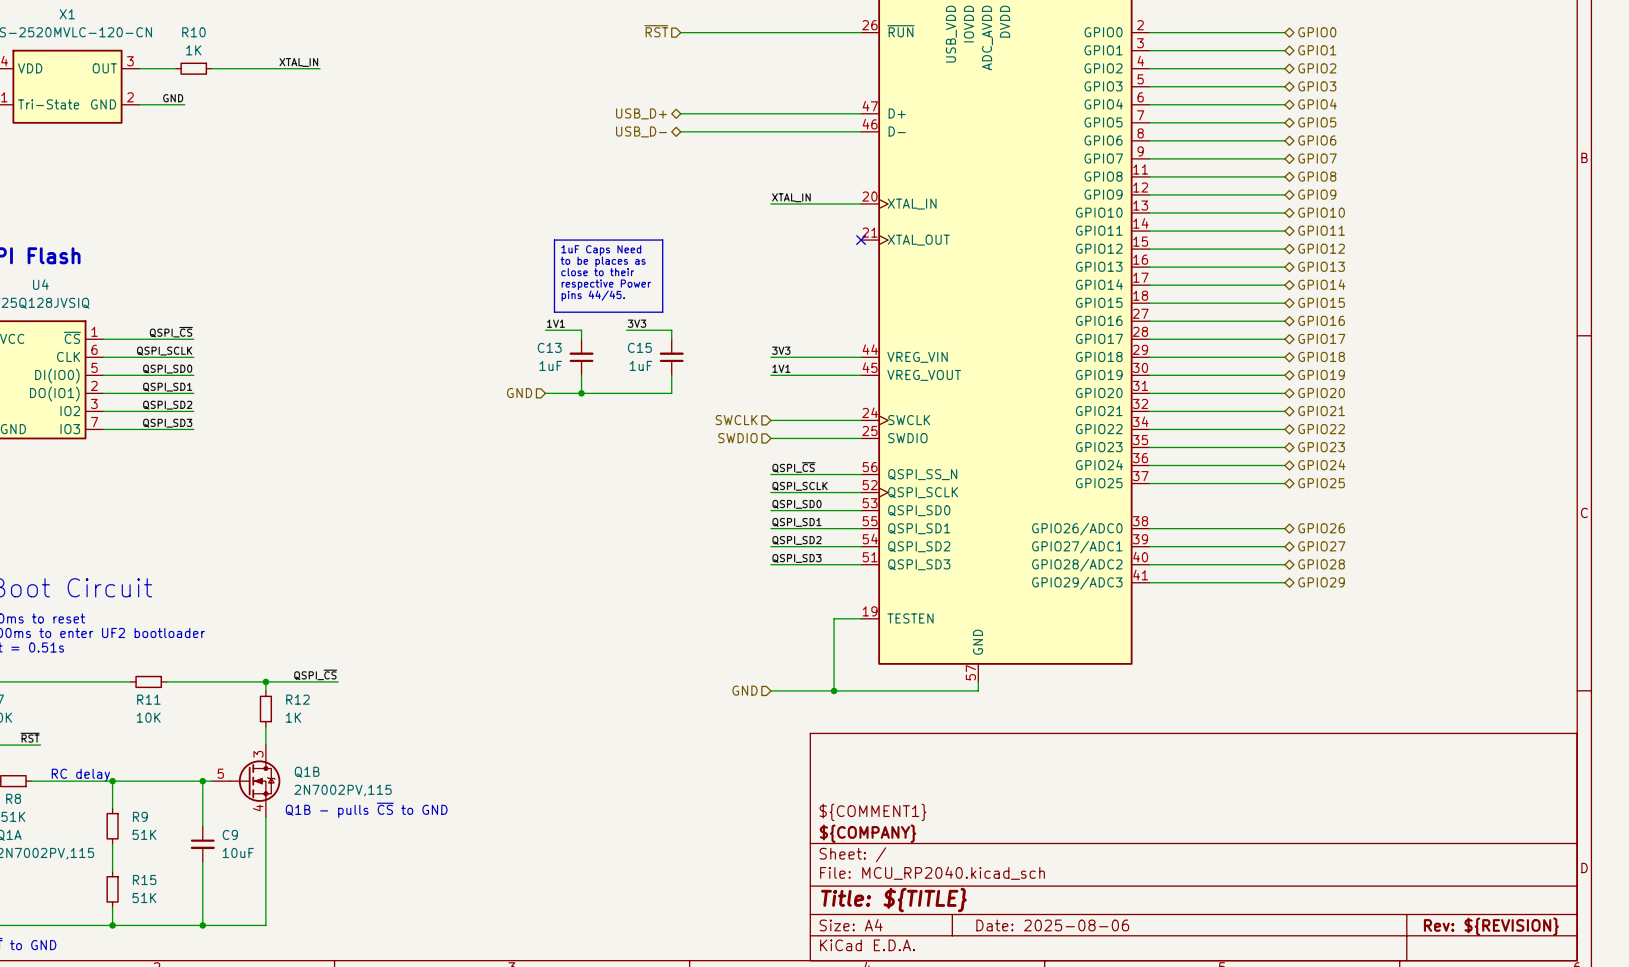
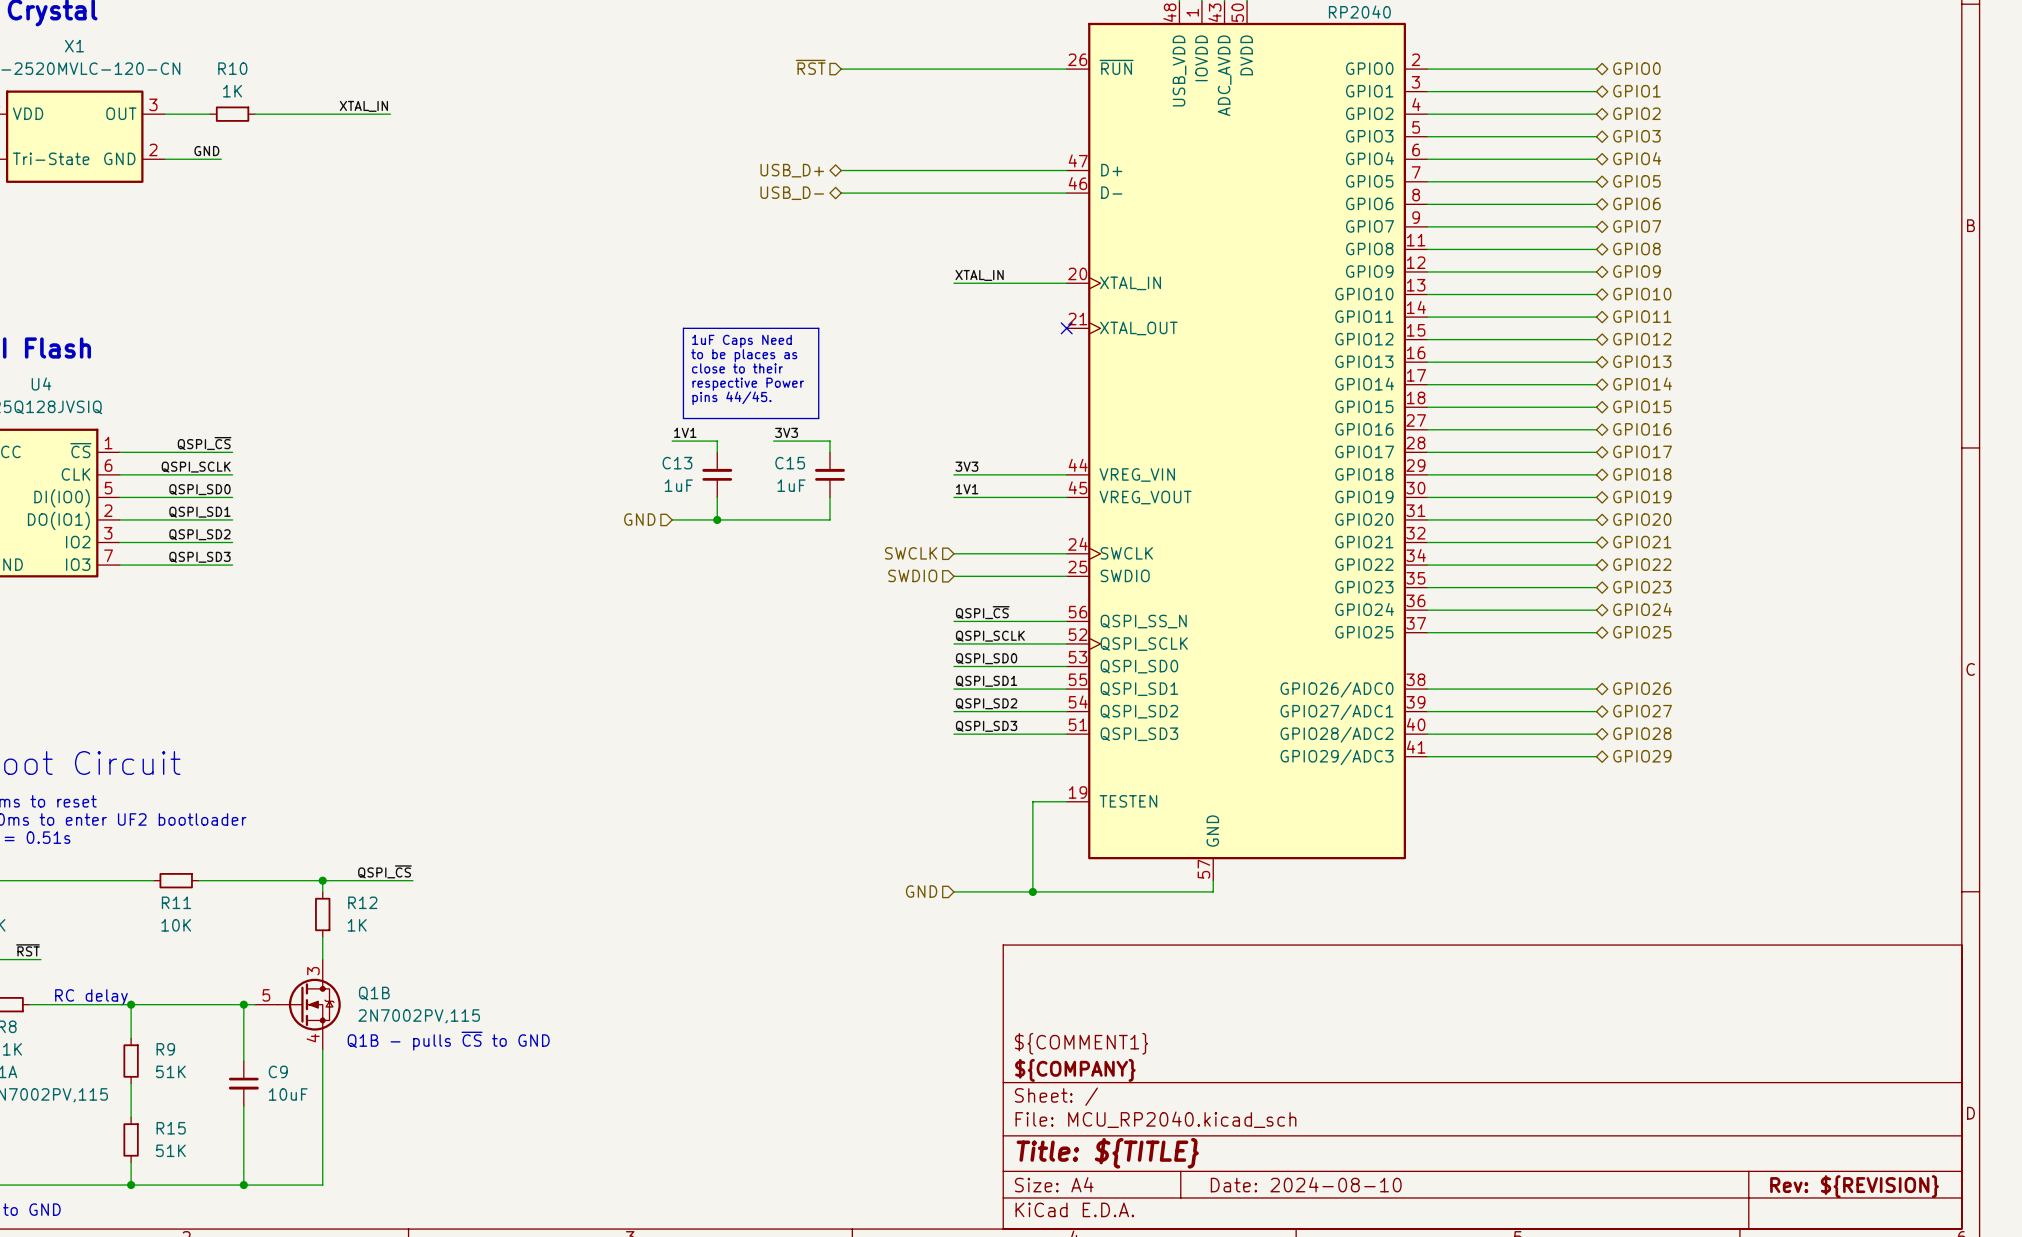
title block: Date: 2025-08-06 (1052, 925) -> Date: 2024-08-10 (1306, 1184)

